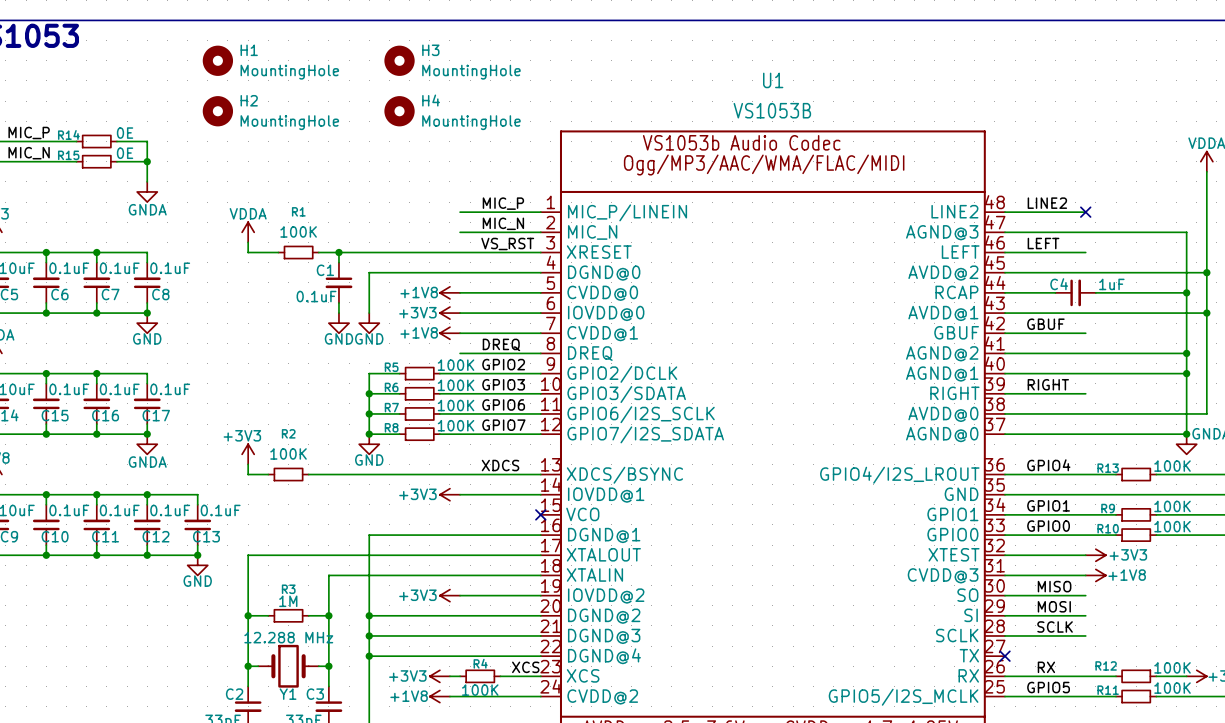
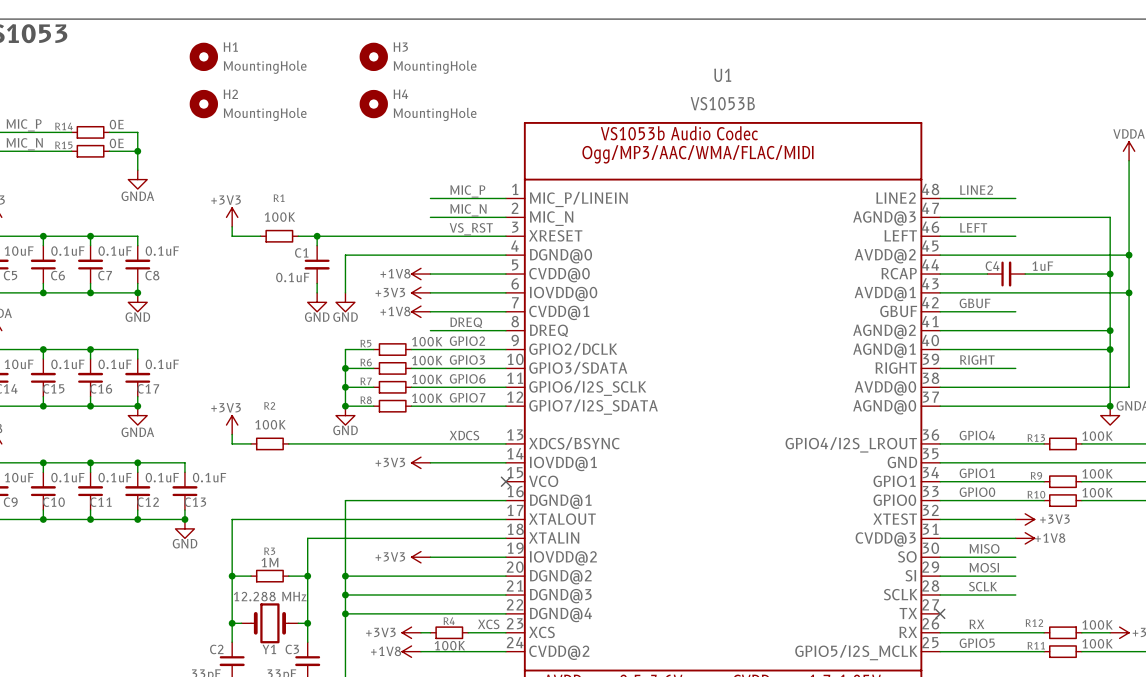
no-connect mark: (1085, 212) -> none
power symbol: VDDA (248, 232) -> +3V3 (232, 217)

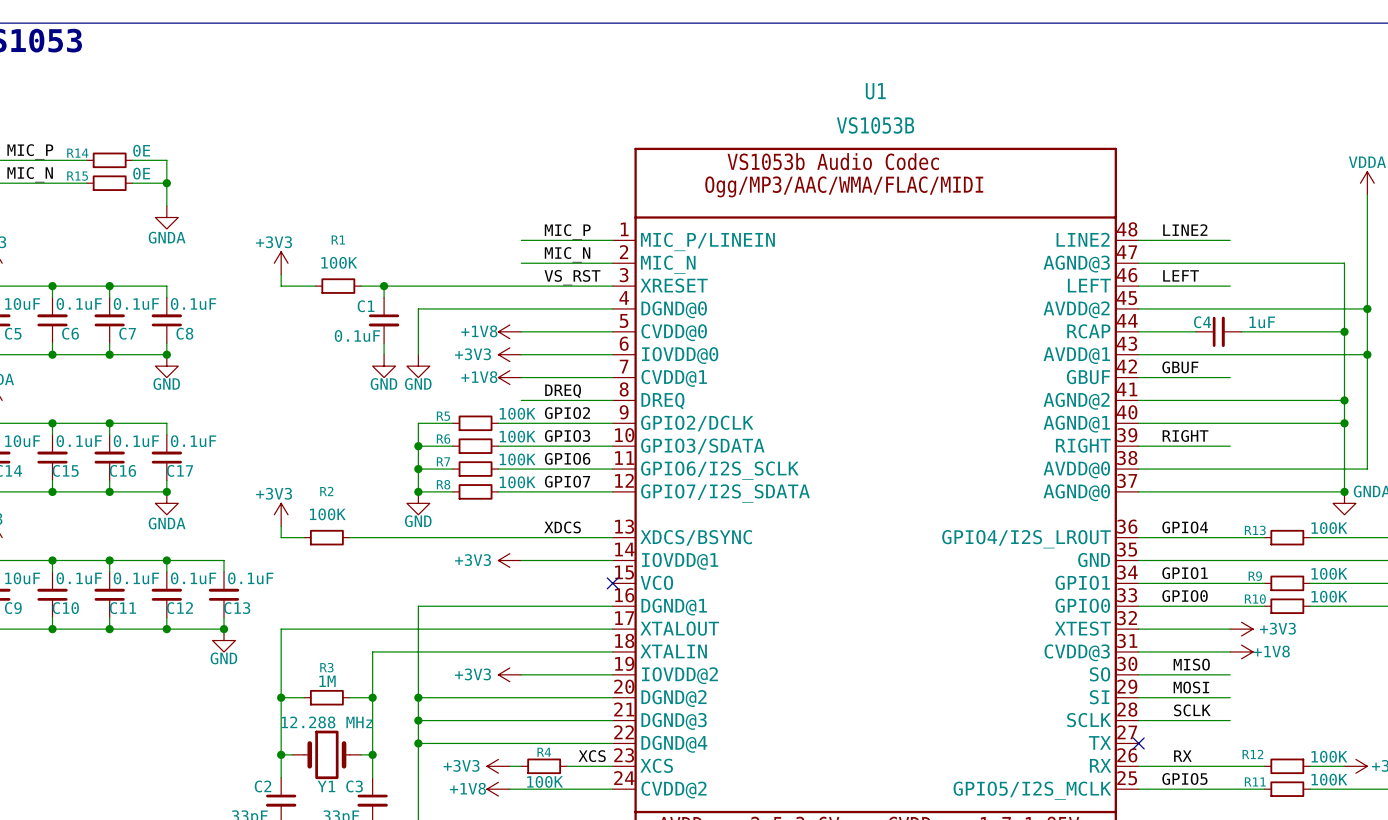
H1: MountingHole (203, 56) -> none
H3: MountingHole (373, 56) -> none
H2: MountingHole (203, 104) -> none
H4: MountingHole (373, 104) -> none

